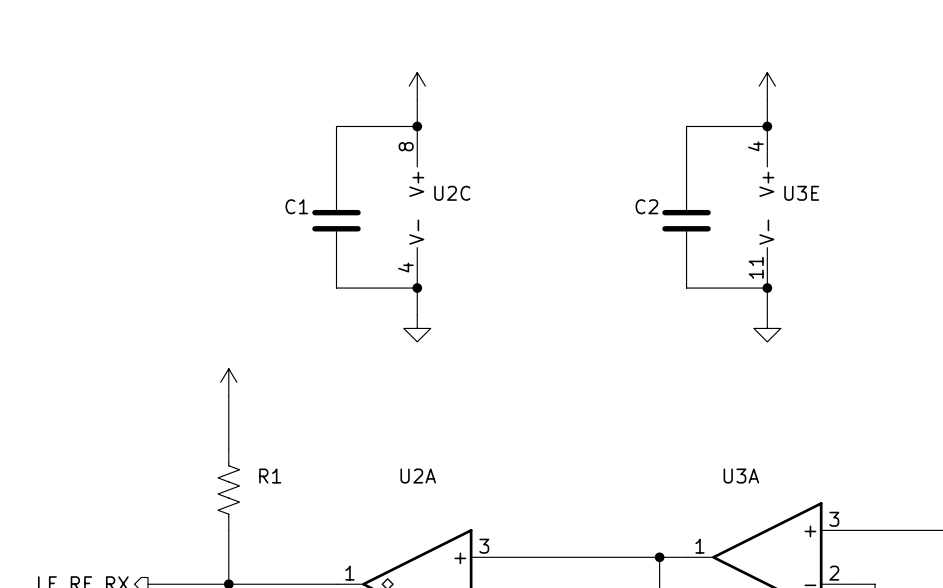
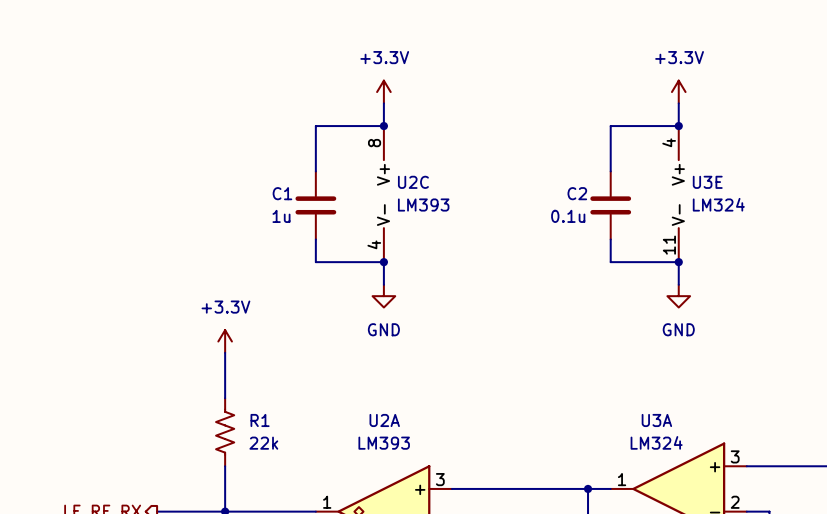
power symbol text: none -> +3.3V (384, 57)
power symbol text: none -> +3.3V (679, 57)
U3E value: none -> LM324 (718, 204)
U2C value: none -> LM393 (423, 205)
C1 value: none -> 1u (281, 216)
C2 value: none -> 0.1u (568, 216)
power symbol text: none -> +3.3V (225, 307)
power symbol text: none -> GND (383, 329)
power symbol text: none -> GND (678, 329)
R1 value: none -> 22k (263, 443)
U2A value: none -> LM393 (384, 443)
U3A value: none -> LM324 (656, 442)

